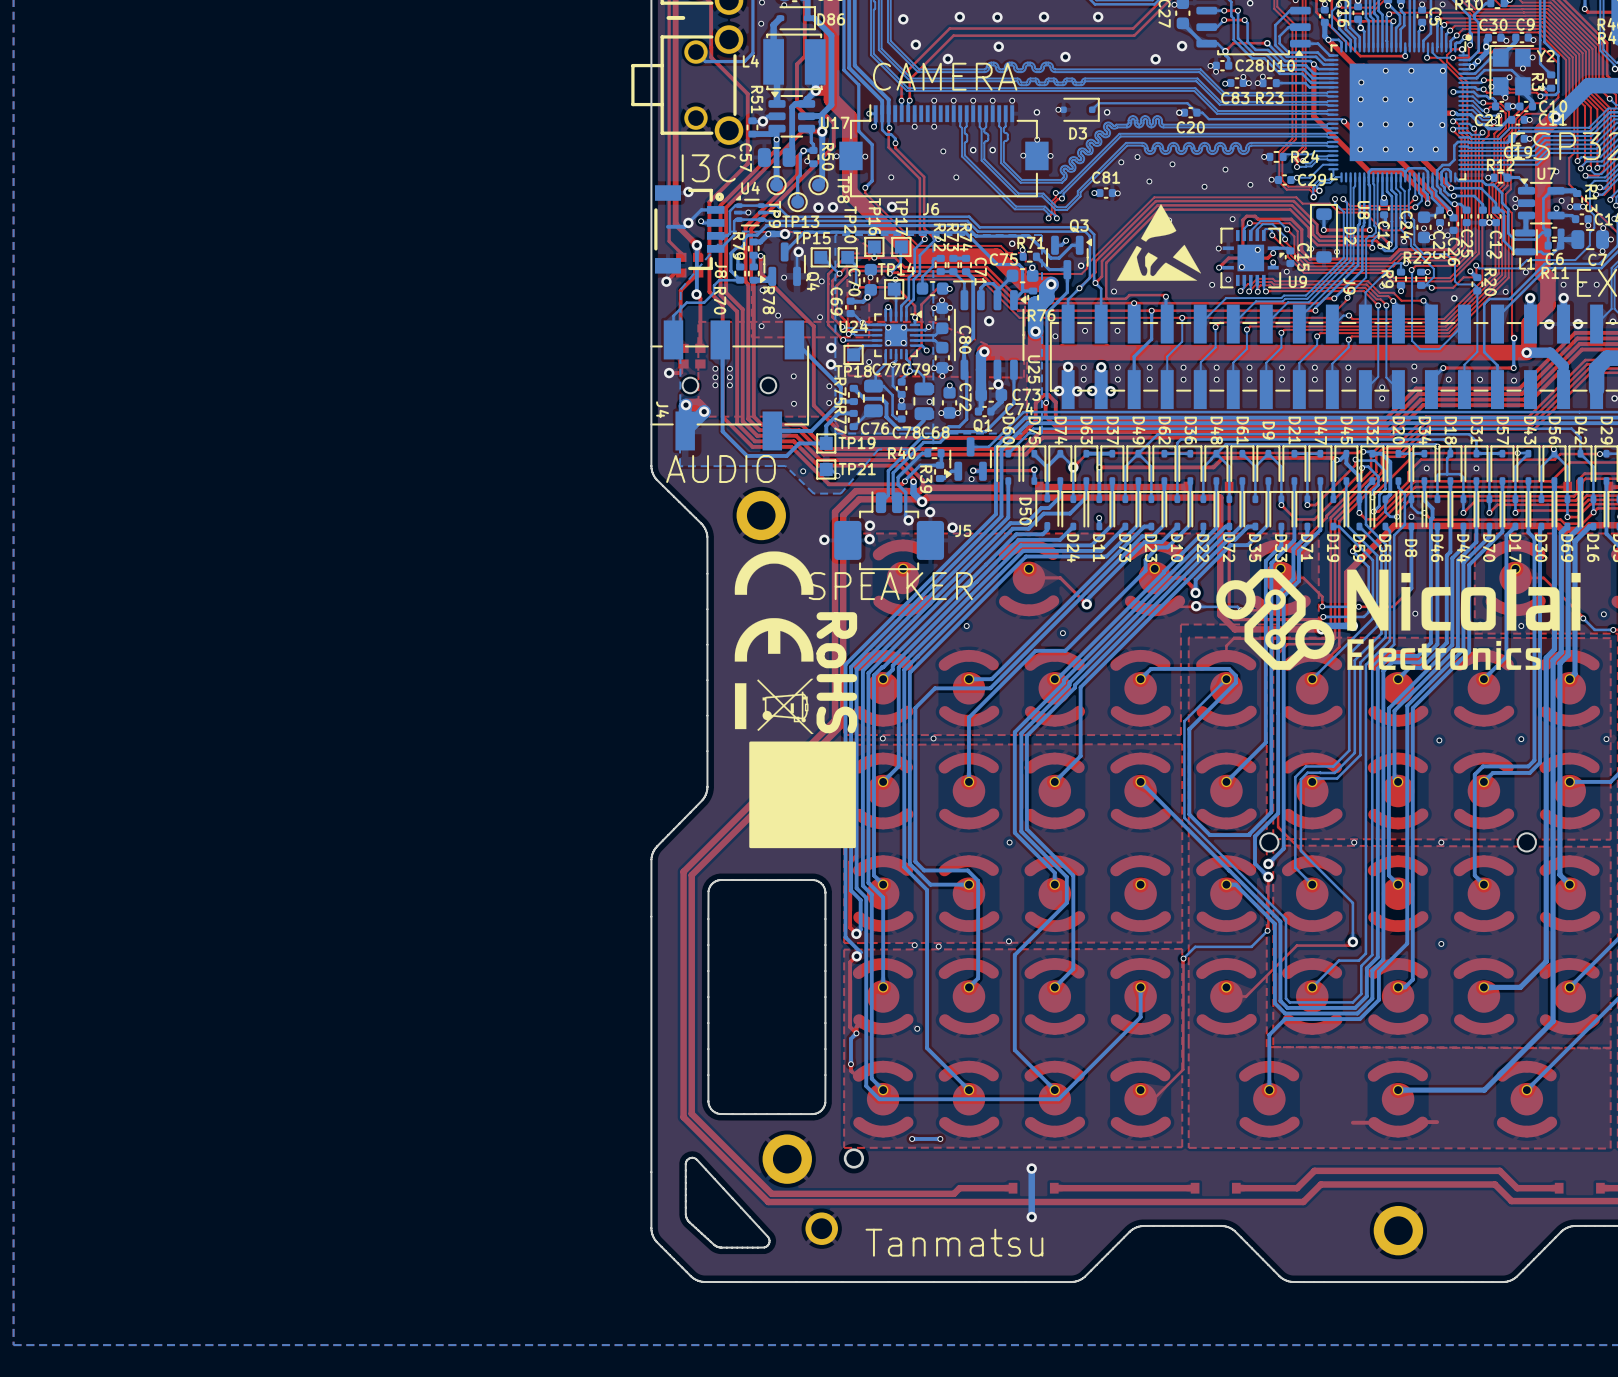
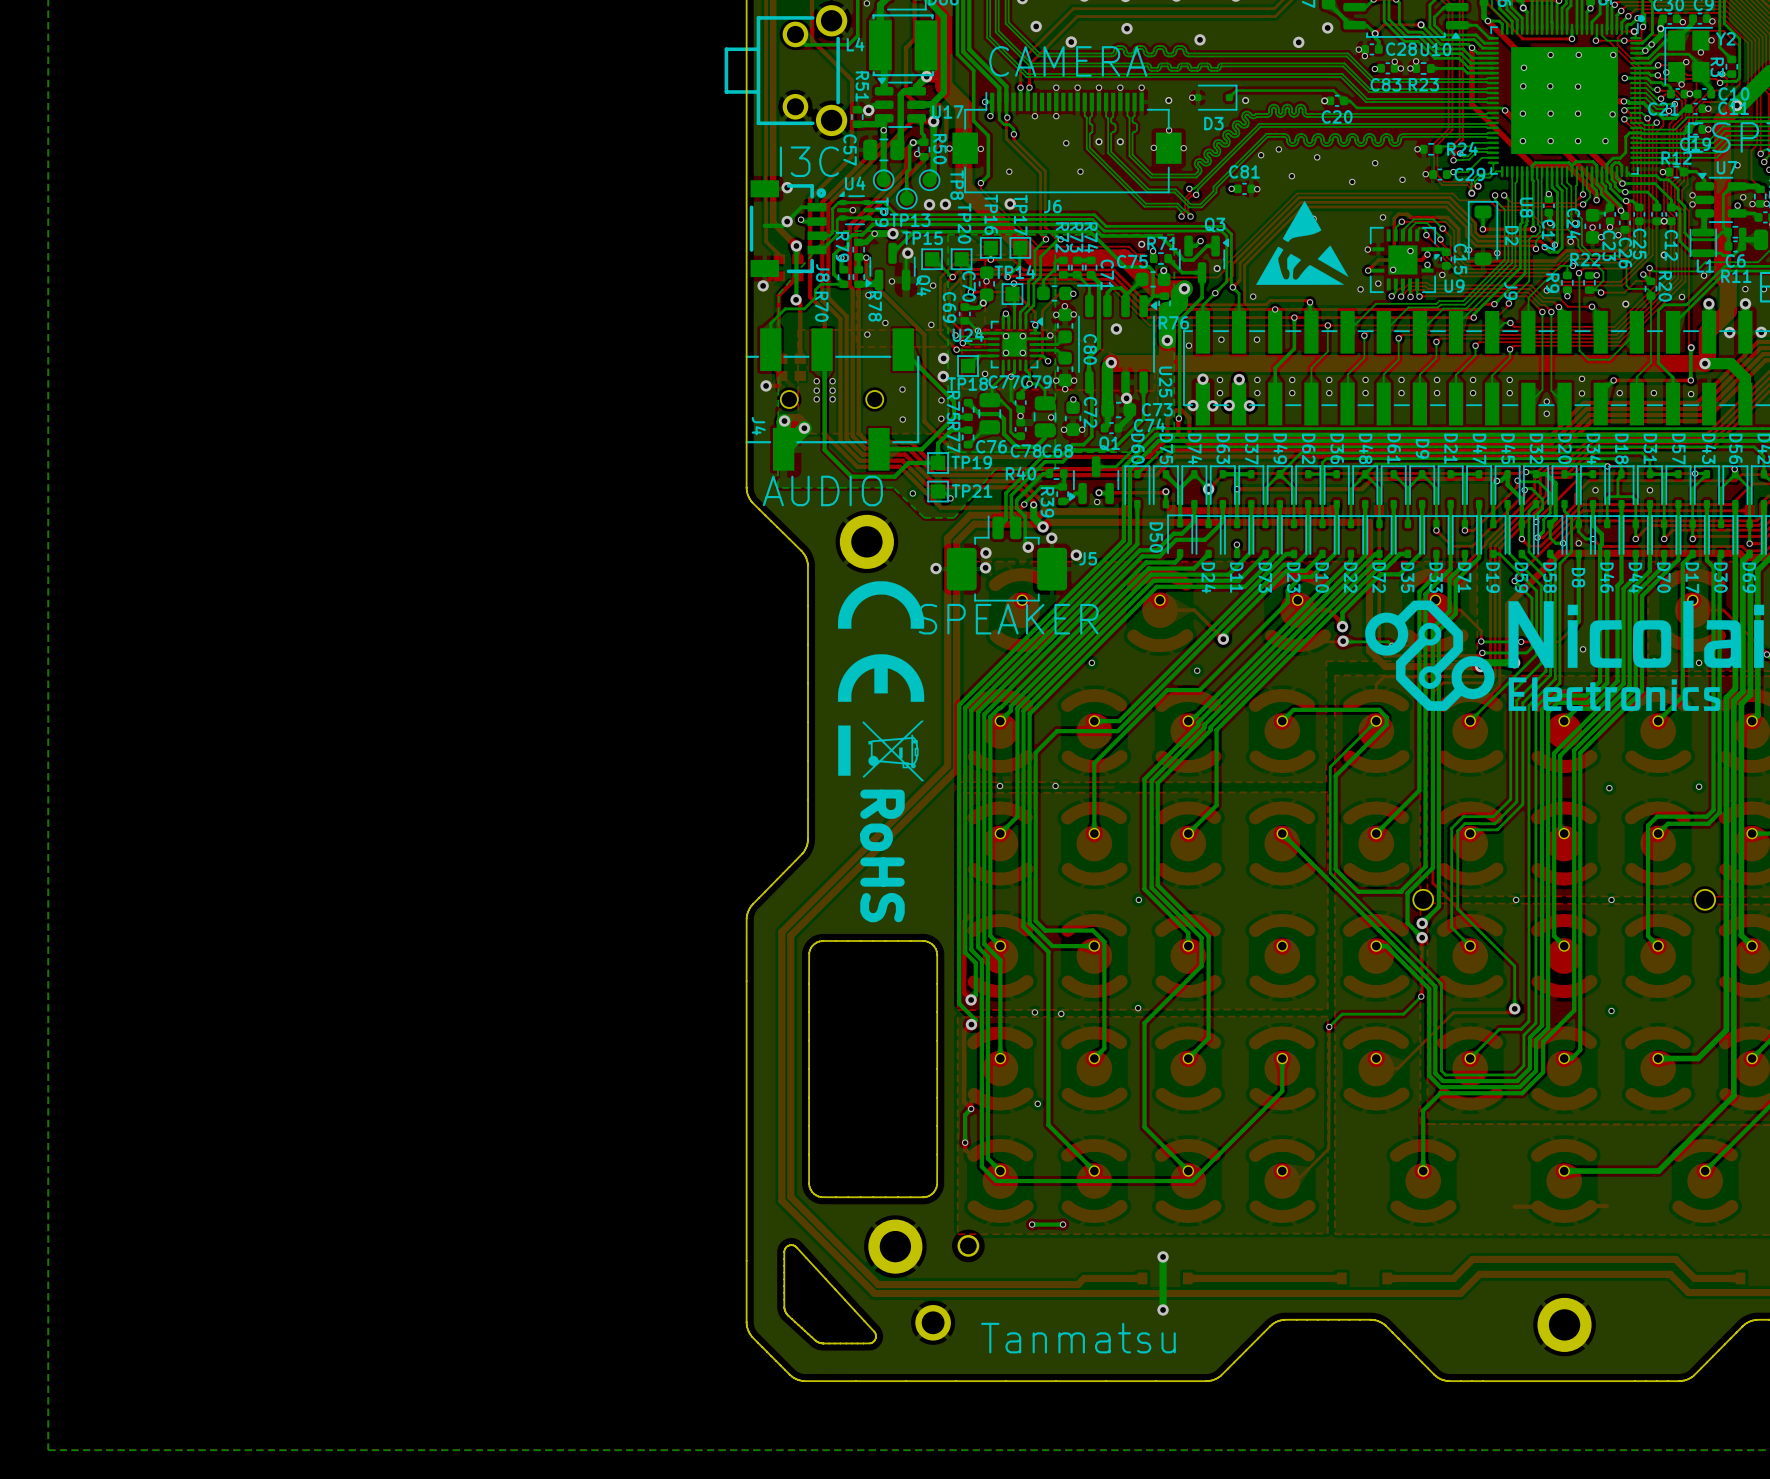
text position: RoHS (836, 672) -> RoHS (882, 855)
drawing: [749, 741, 856, 849] -> none

